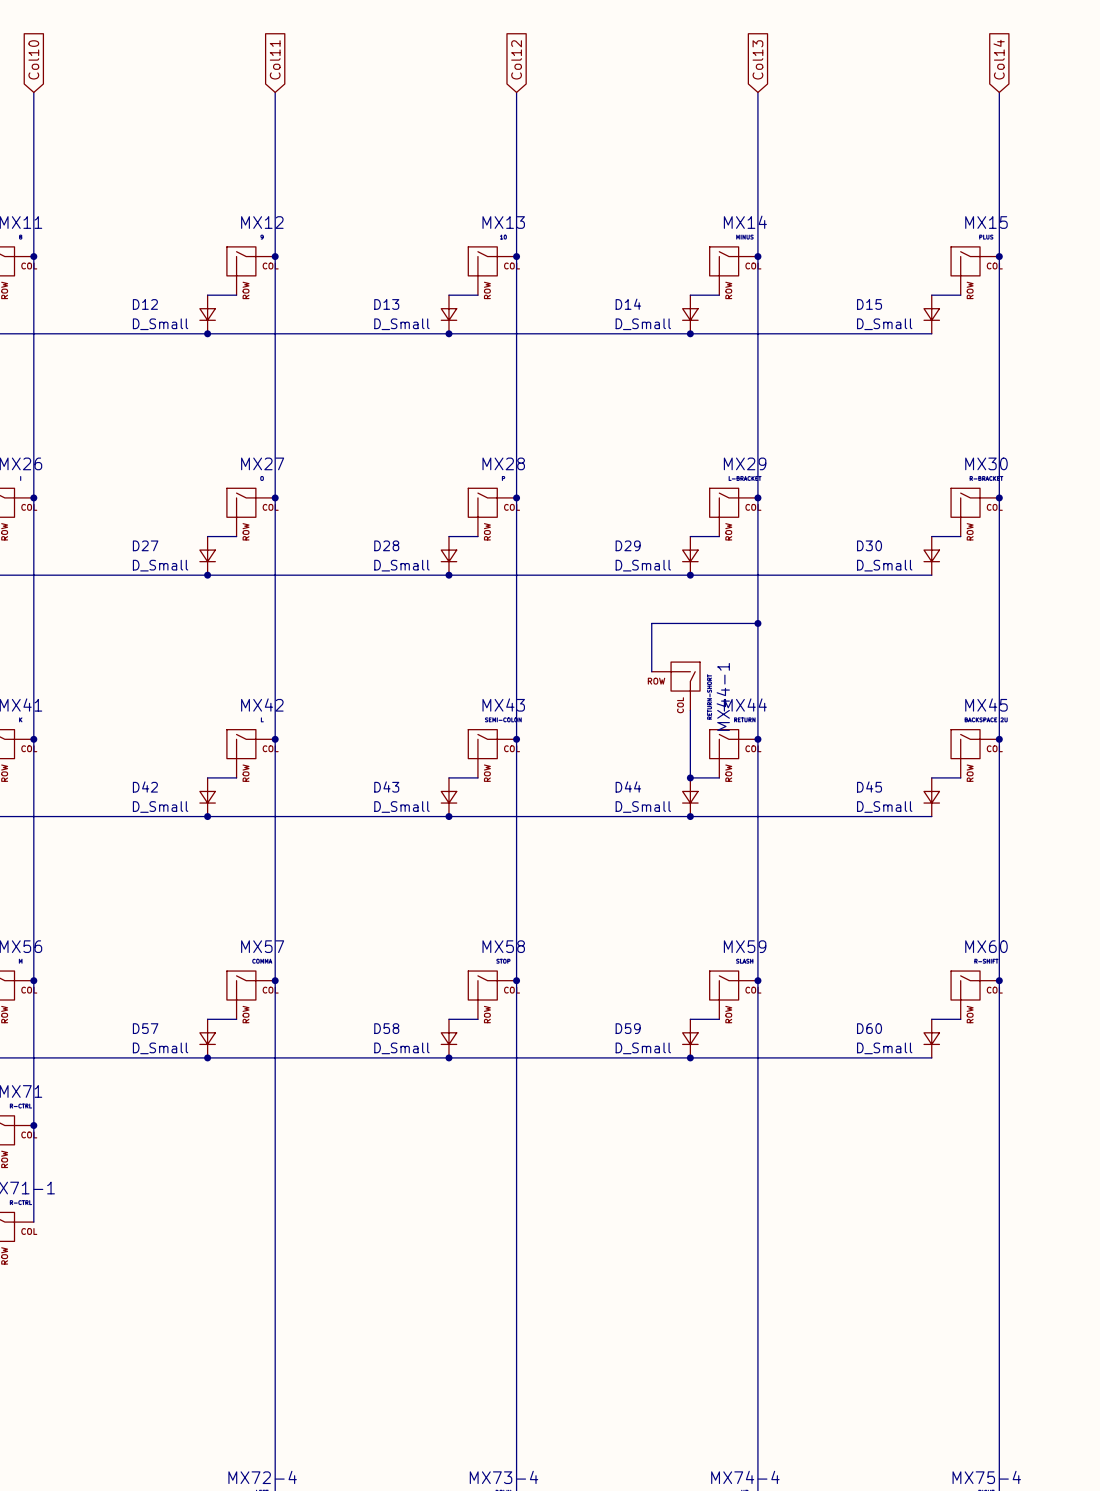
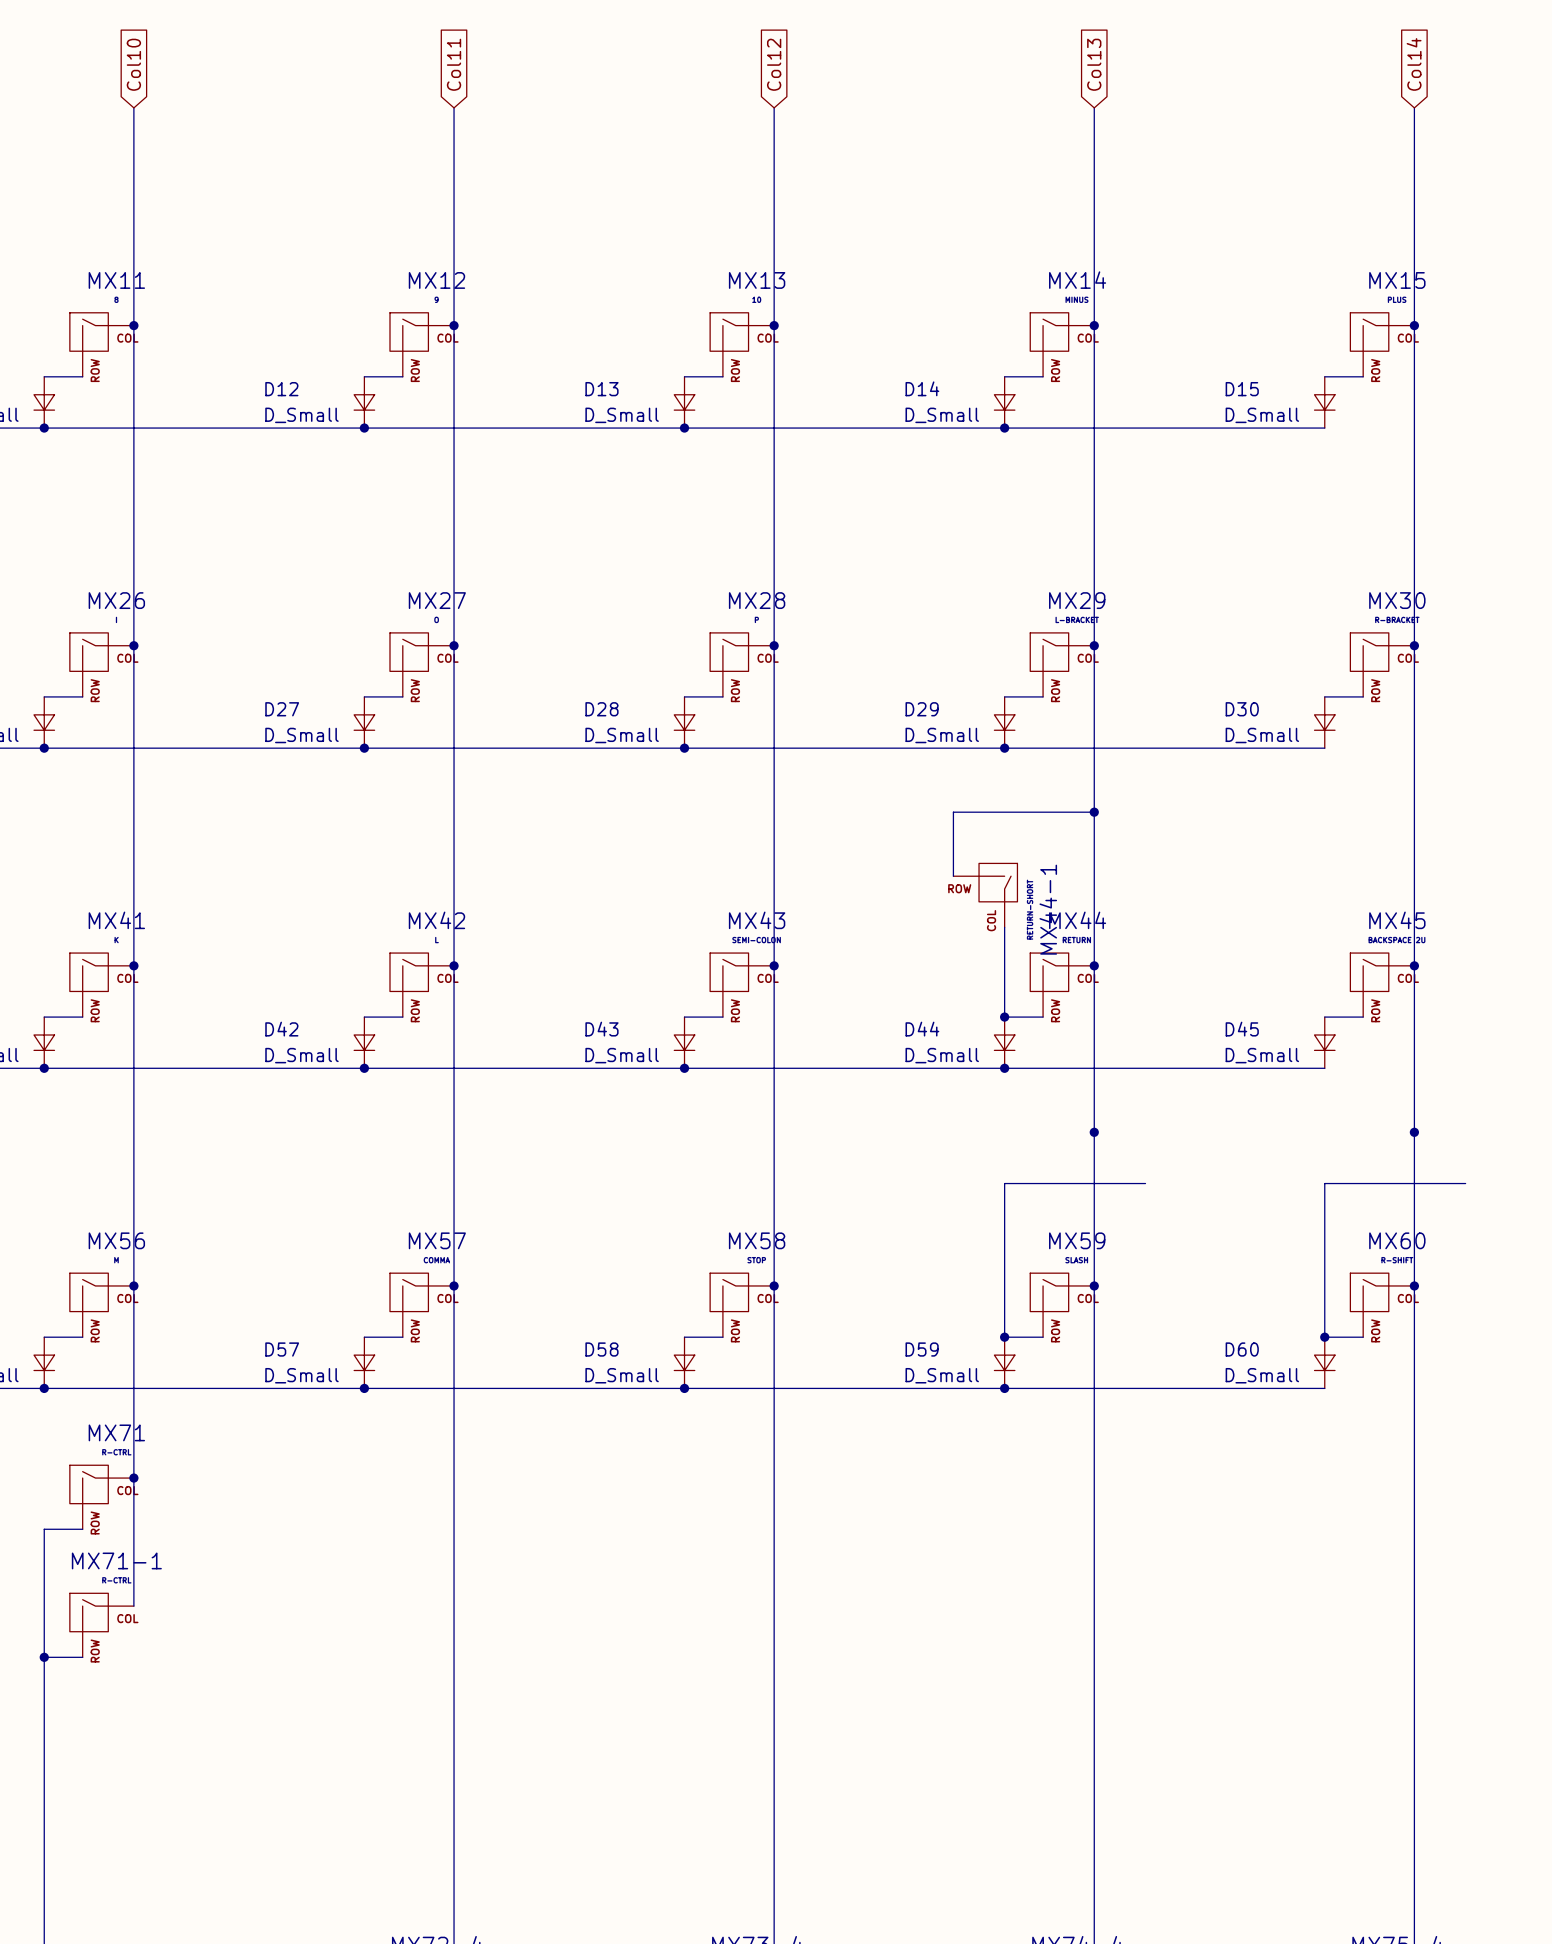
junction: none -> (1094, 1132)
junction: none -> (1414, 1132)
wire: none -> (1145, 1183) (1004, 1183) (1004, 1337)
wire: none -> (1465, 1183) (1324, 1183) (1324, 1337)
junction: none -> (1004, 1337)
junction: none -> (1324, 1337)

